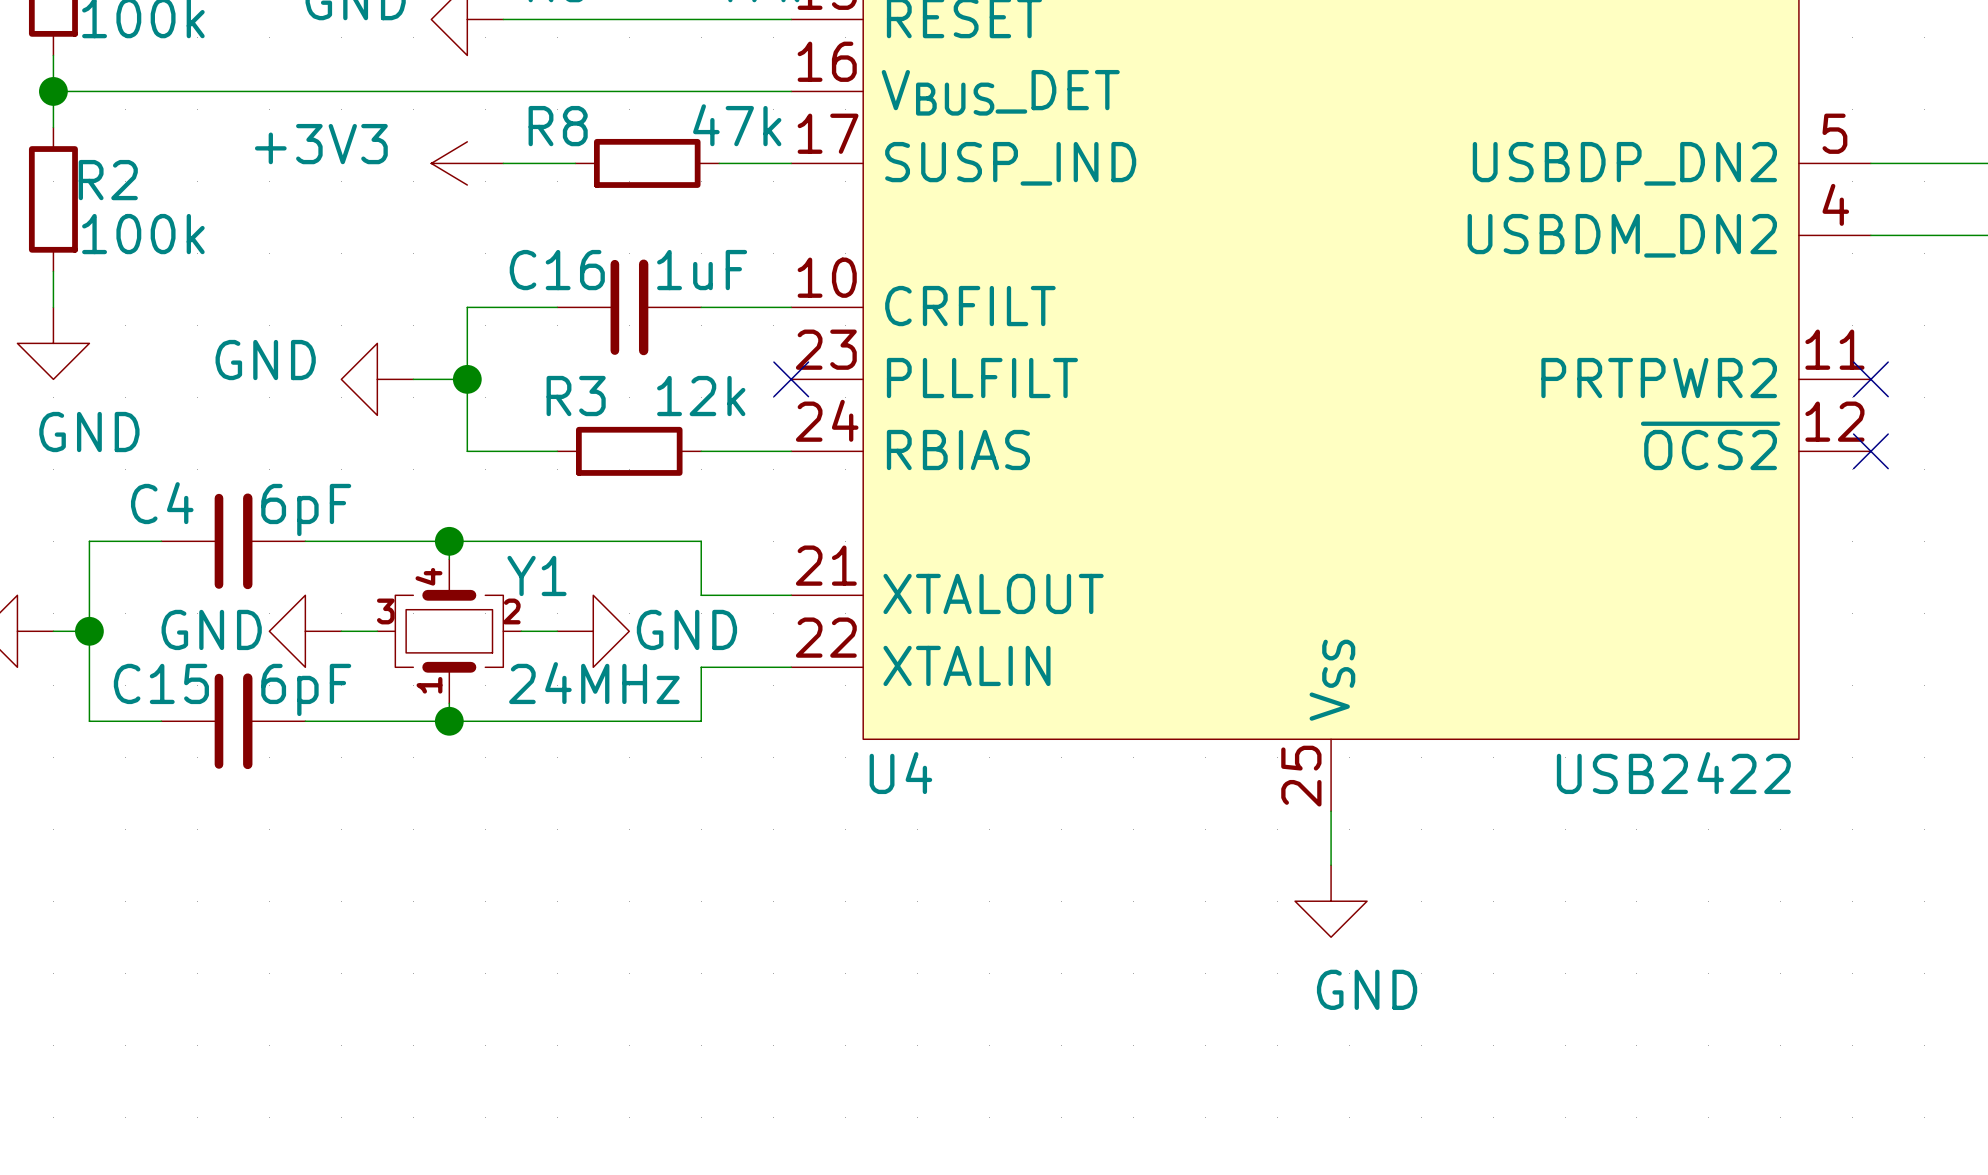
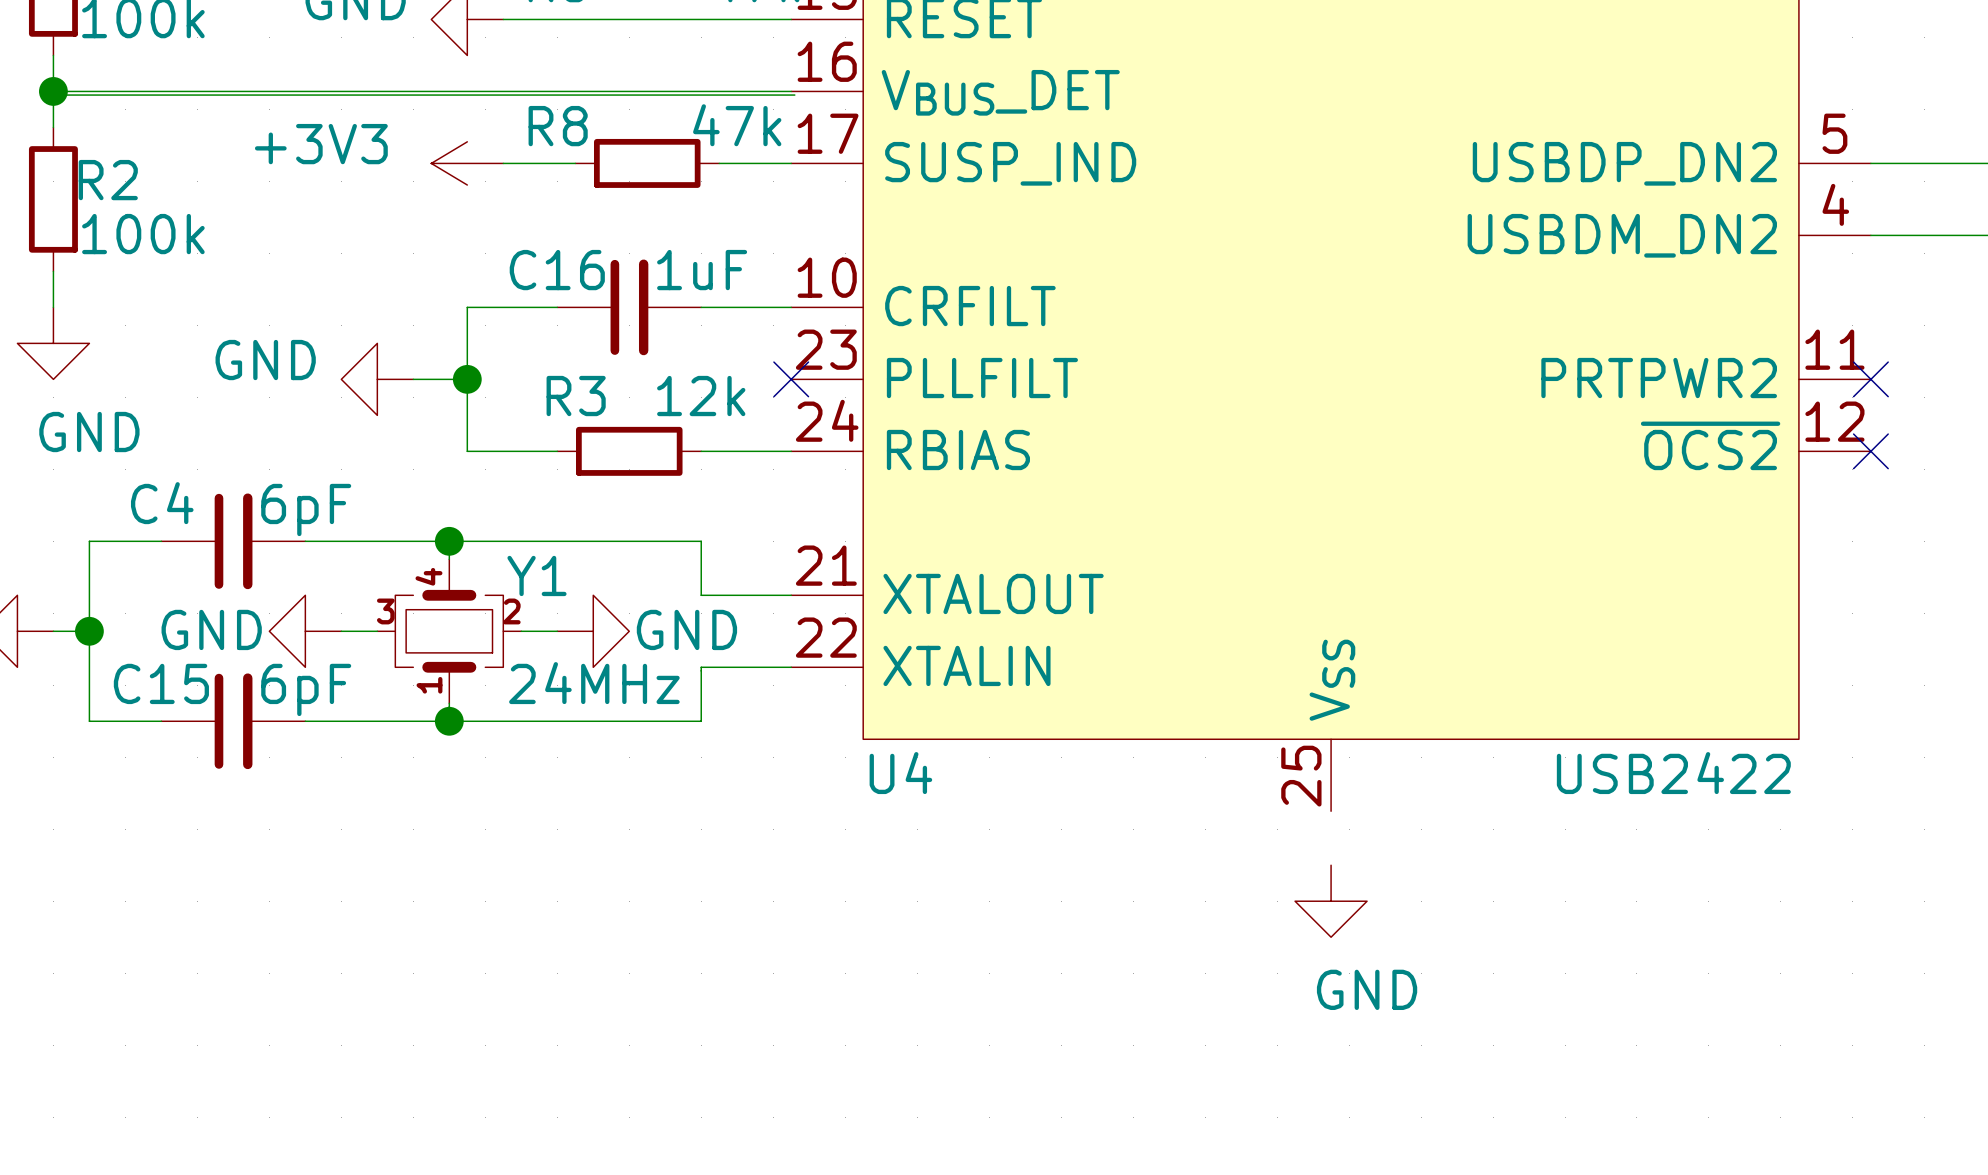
wire: none -> (53, 95) (794, 95)
wire: (1331, 811) (1331, 865) -> none

